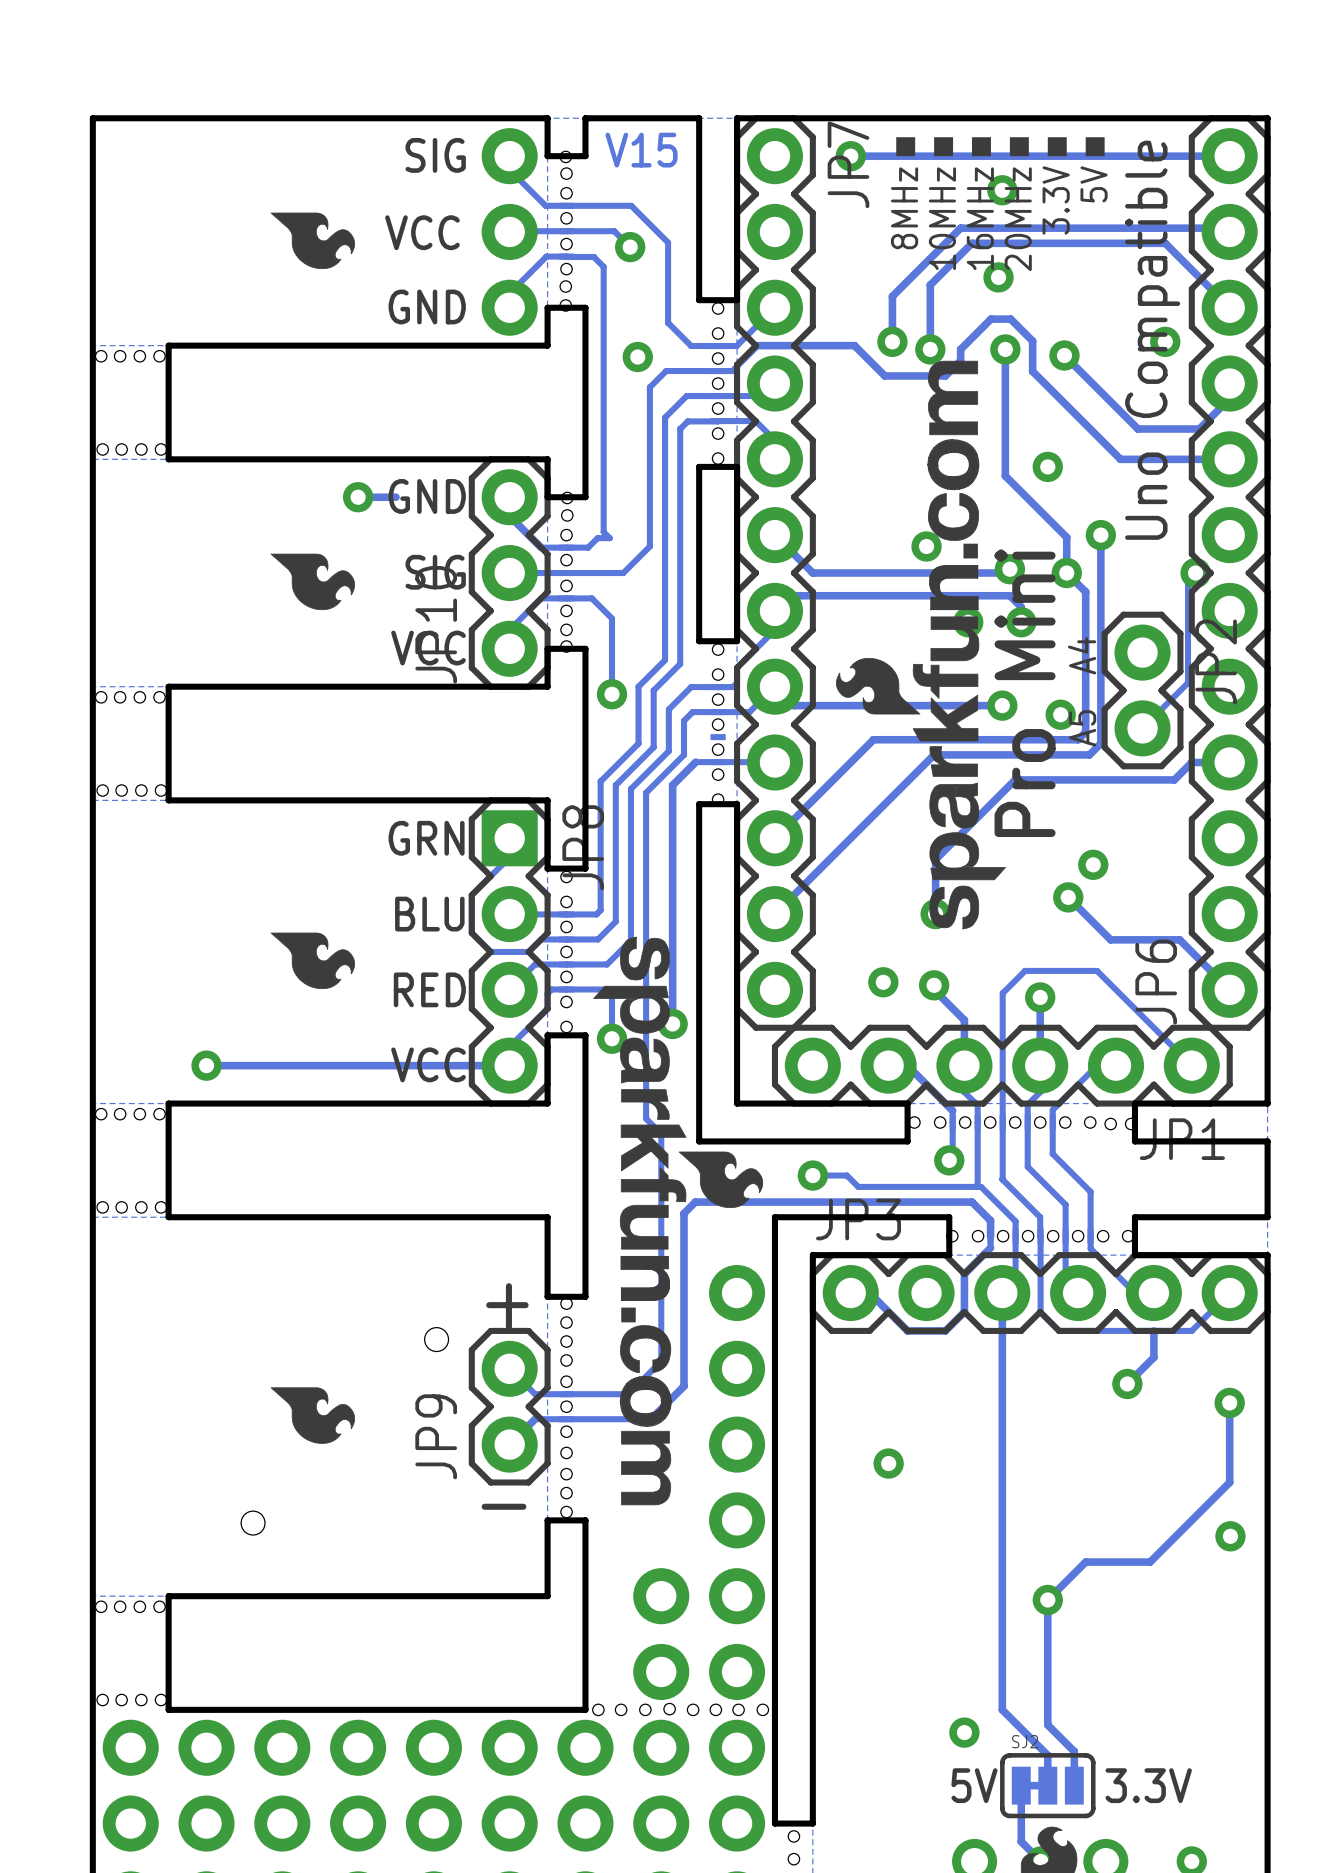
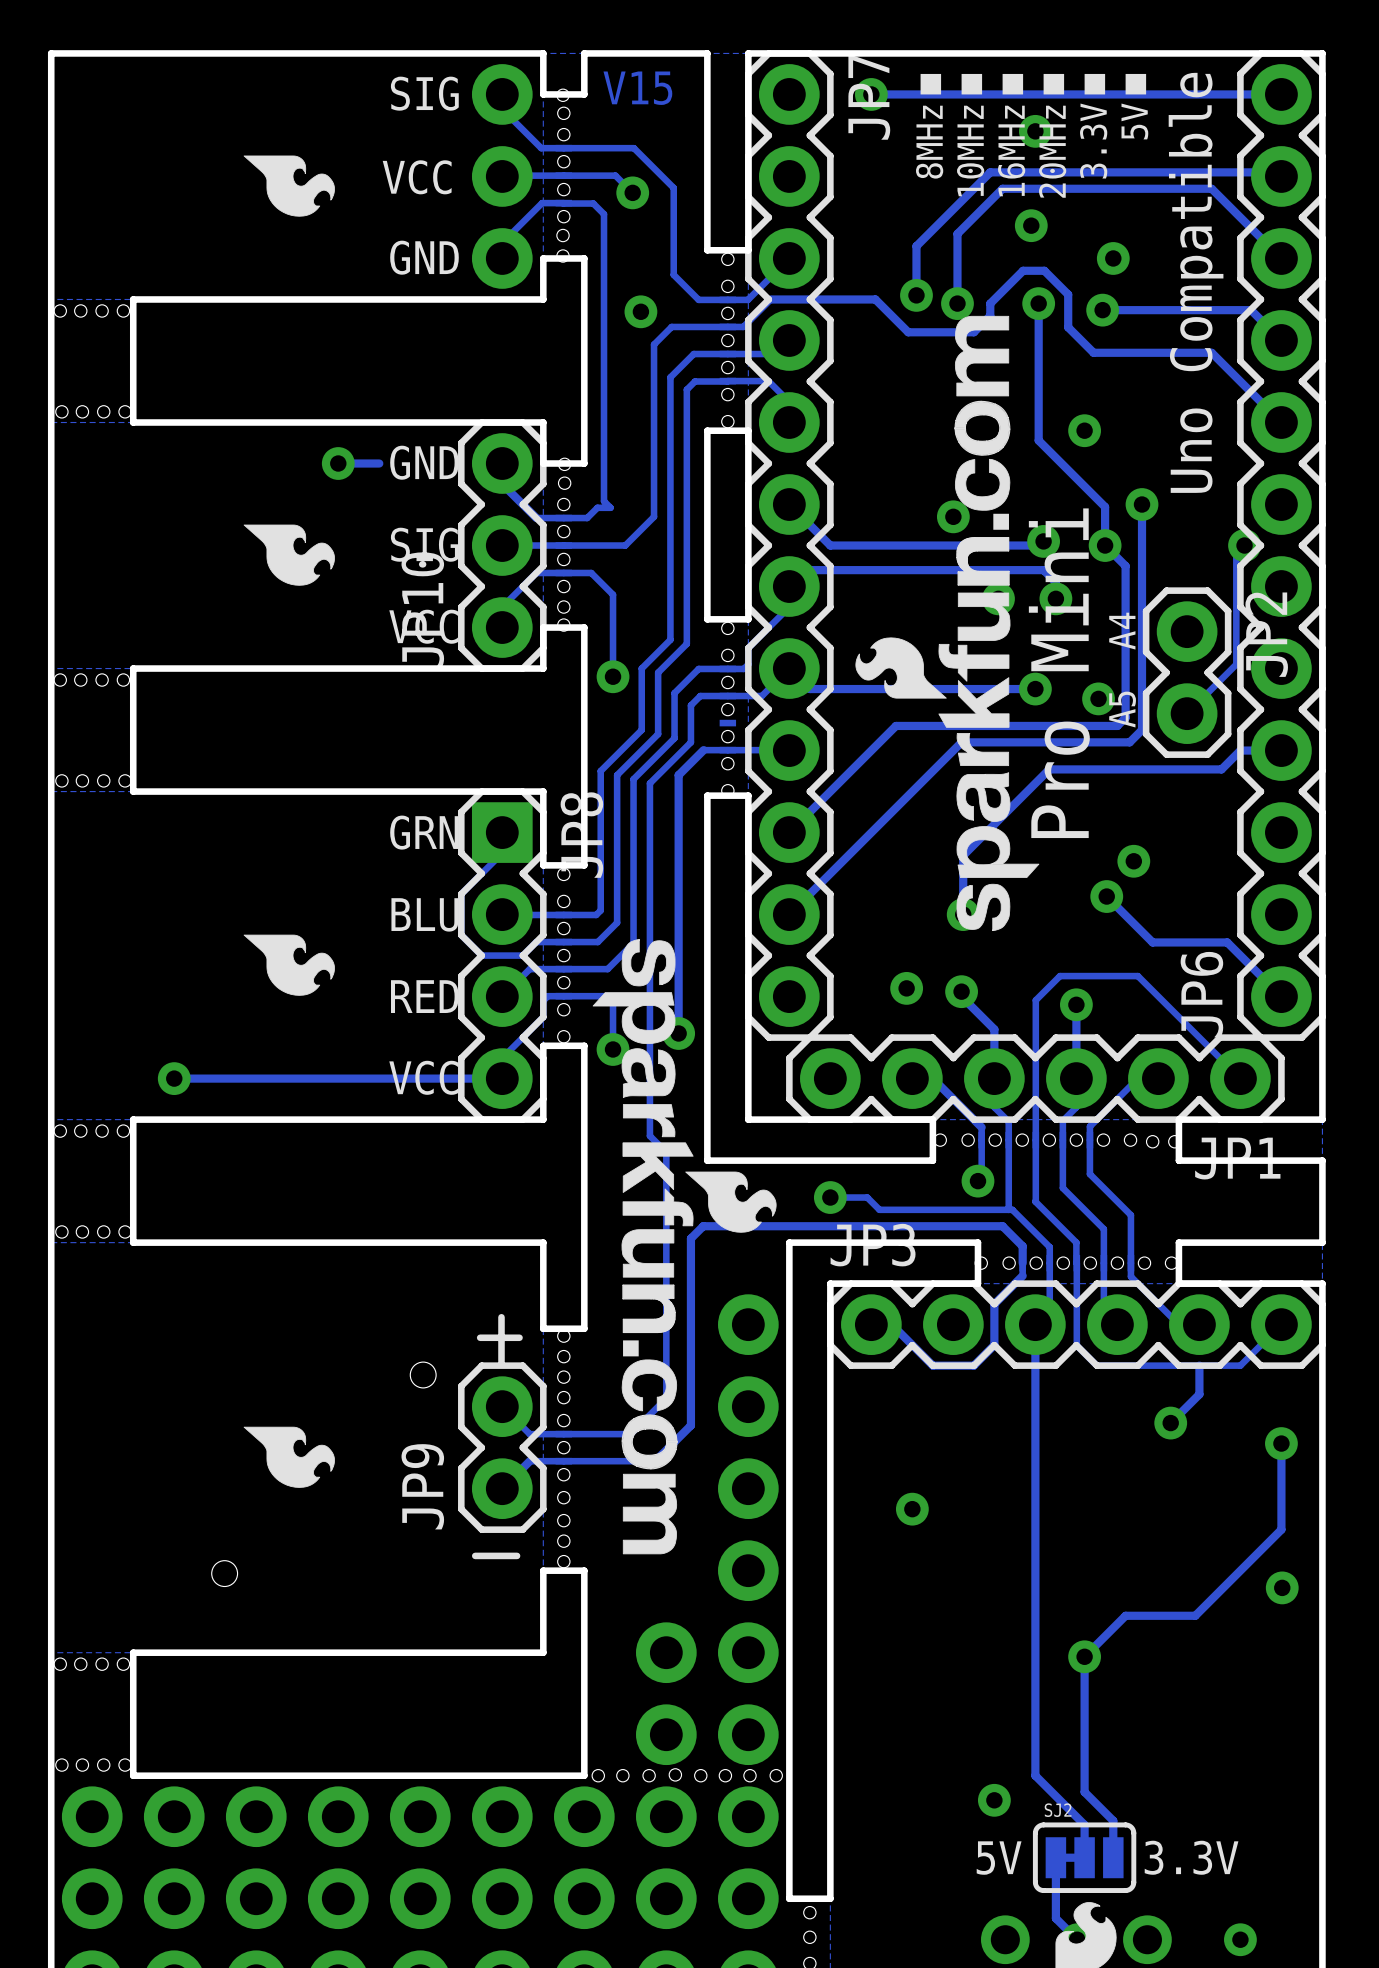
via position: (1165, 341) -> (1113, 258)
track: (1064, 355) (1137, 429) (1199, 429) (1229, 398) (1229, 383) -> (1102, 310) (1251, 310) (1281, 340)
track: (1056, 394) (1120, 459) (1229, 459) -> (1093, 352) (1211, 352) (1281, 422)

